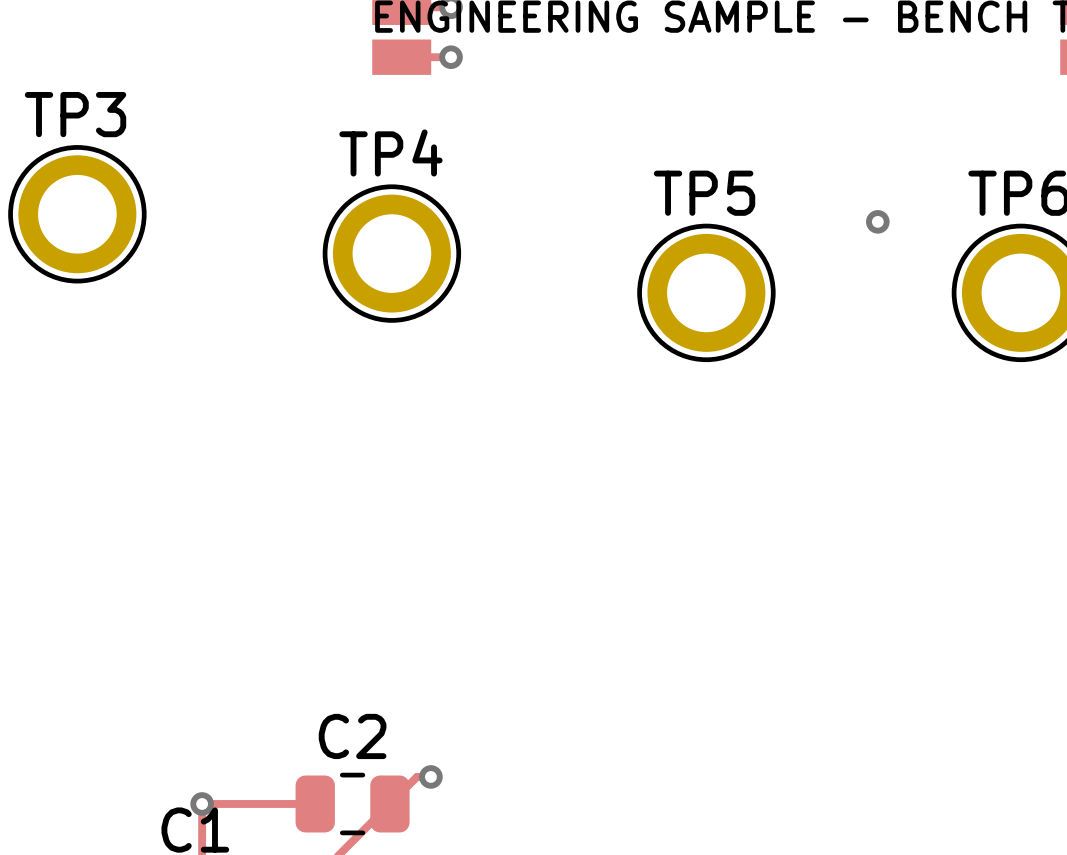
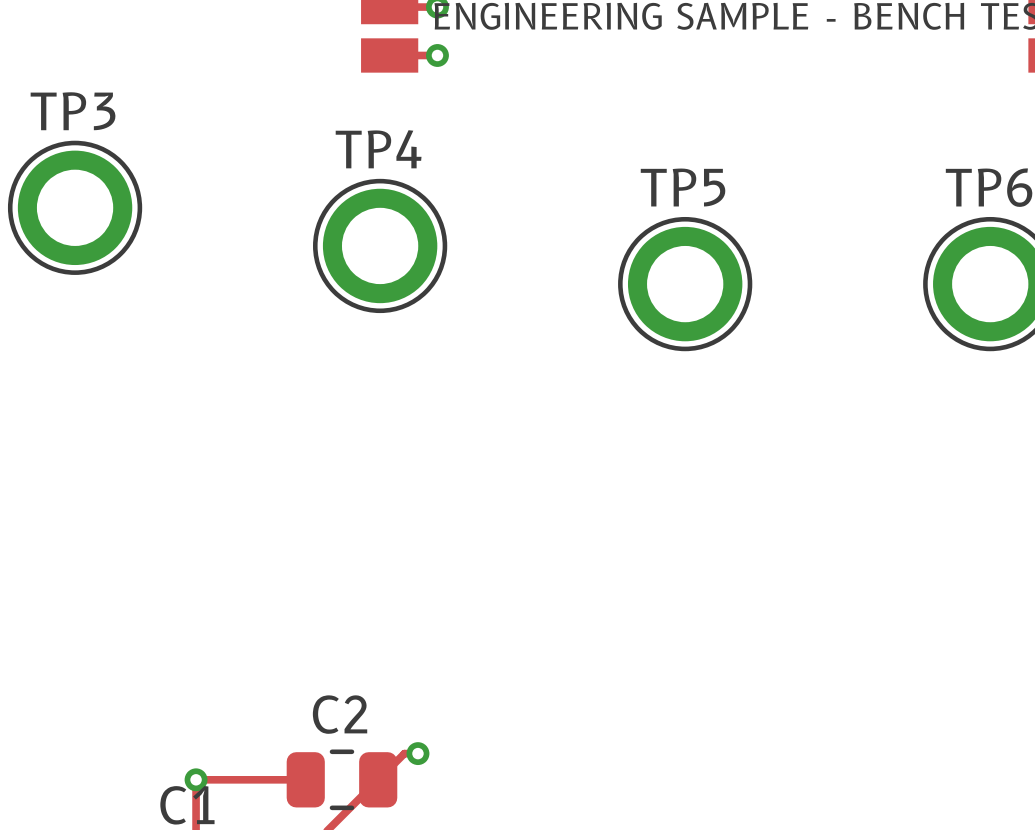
via: (877, 221) -> none

